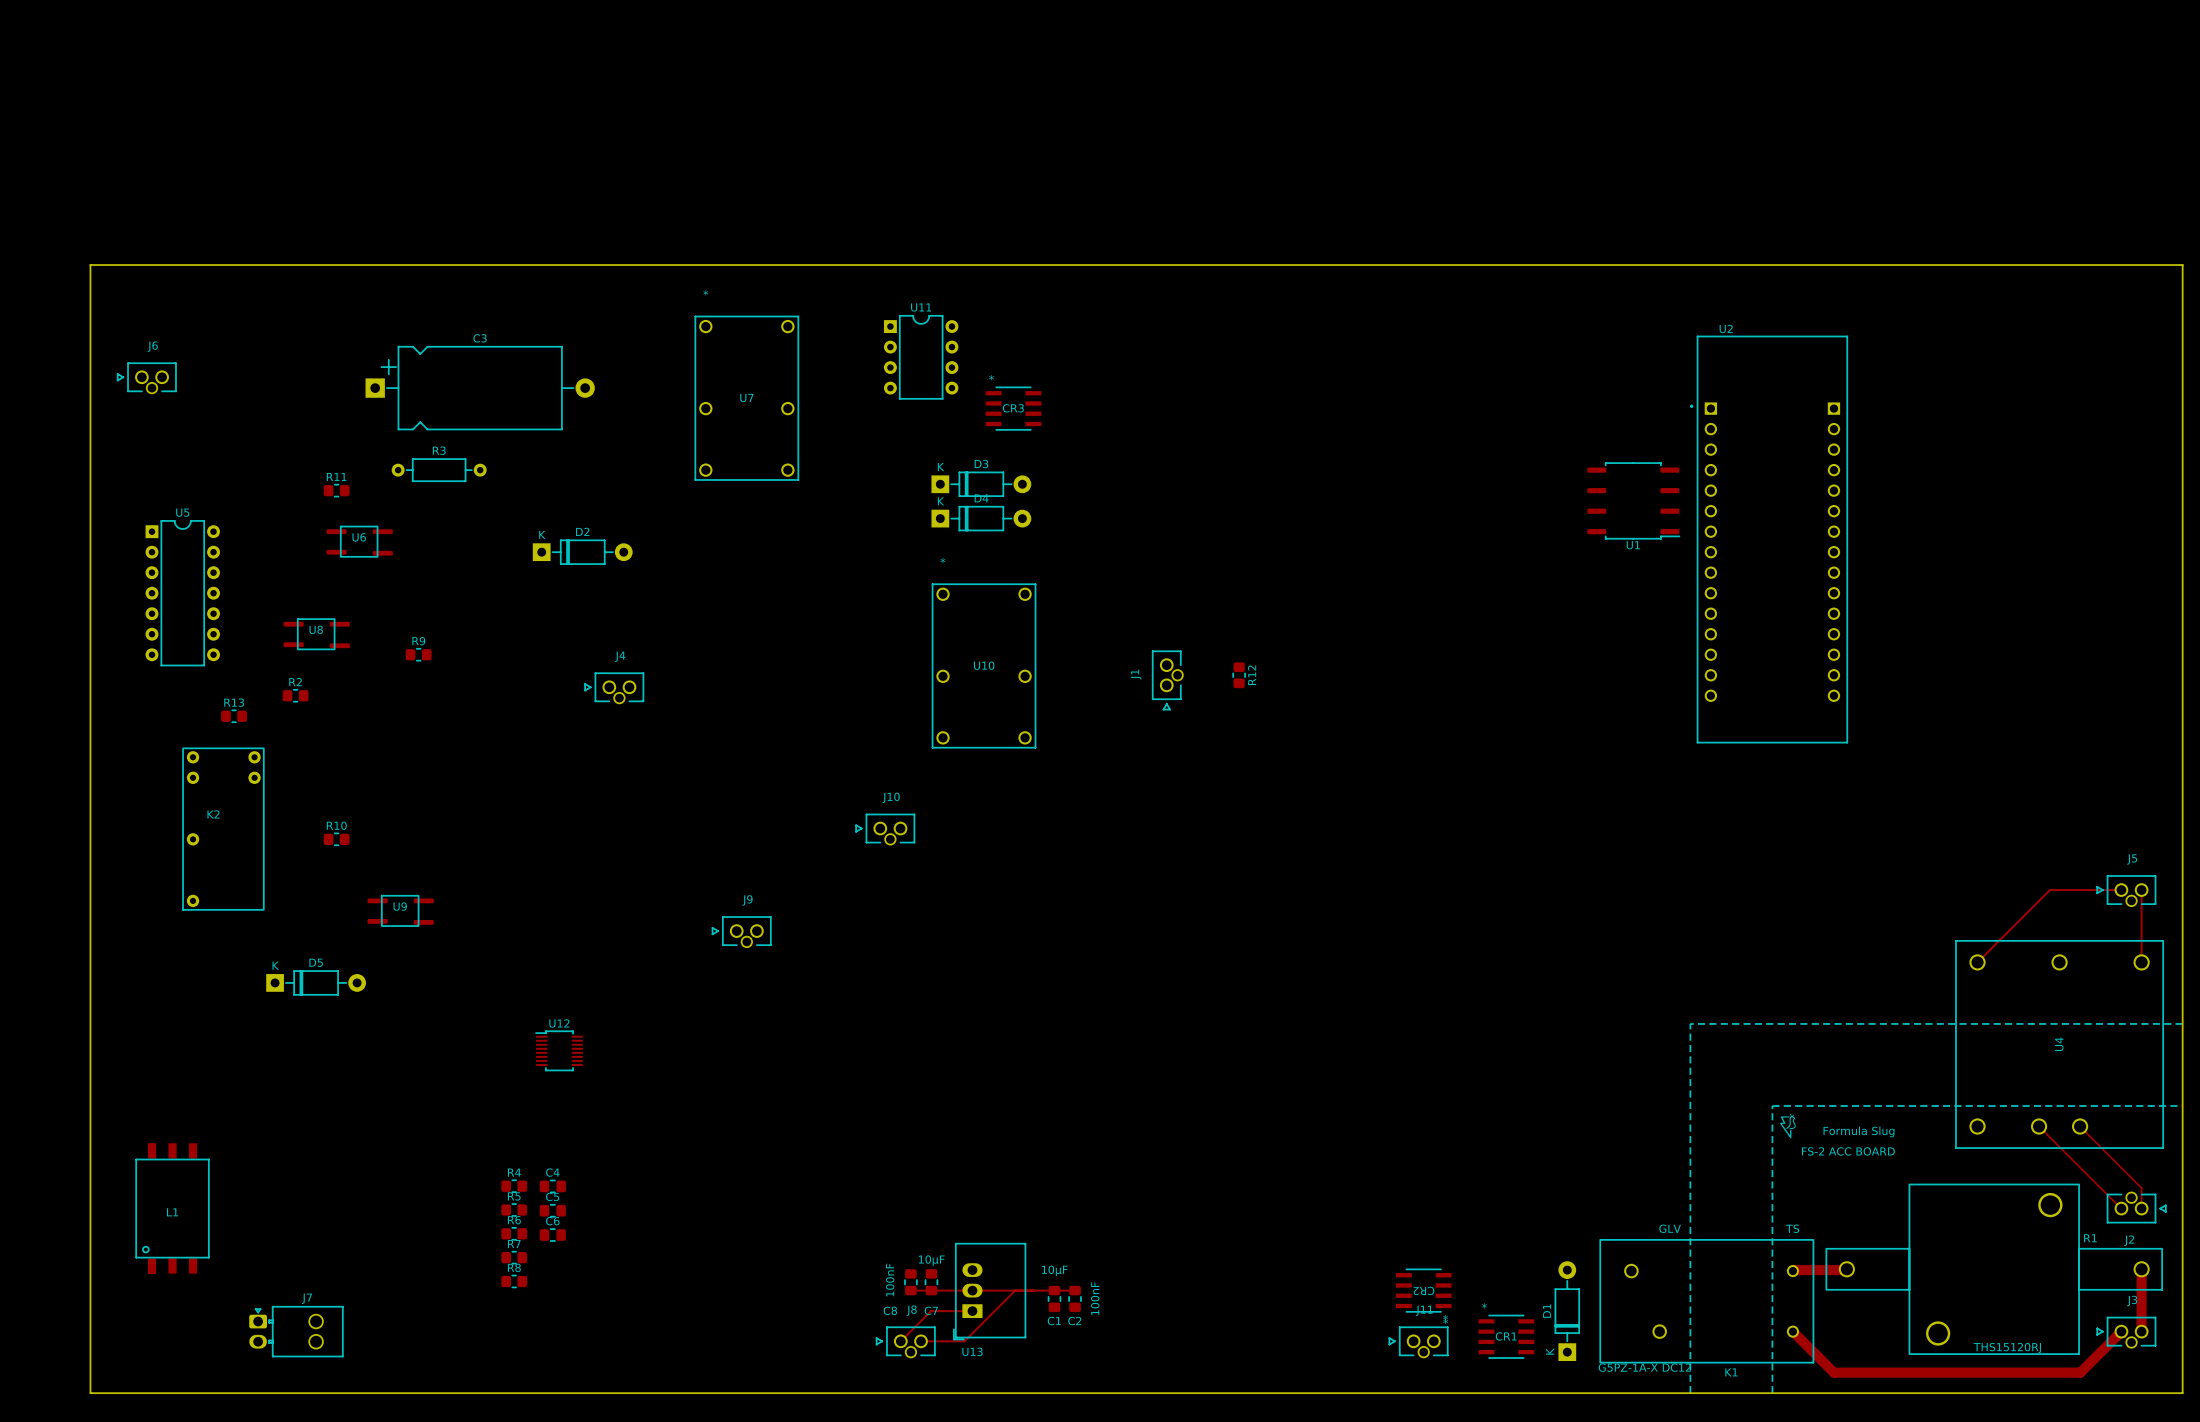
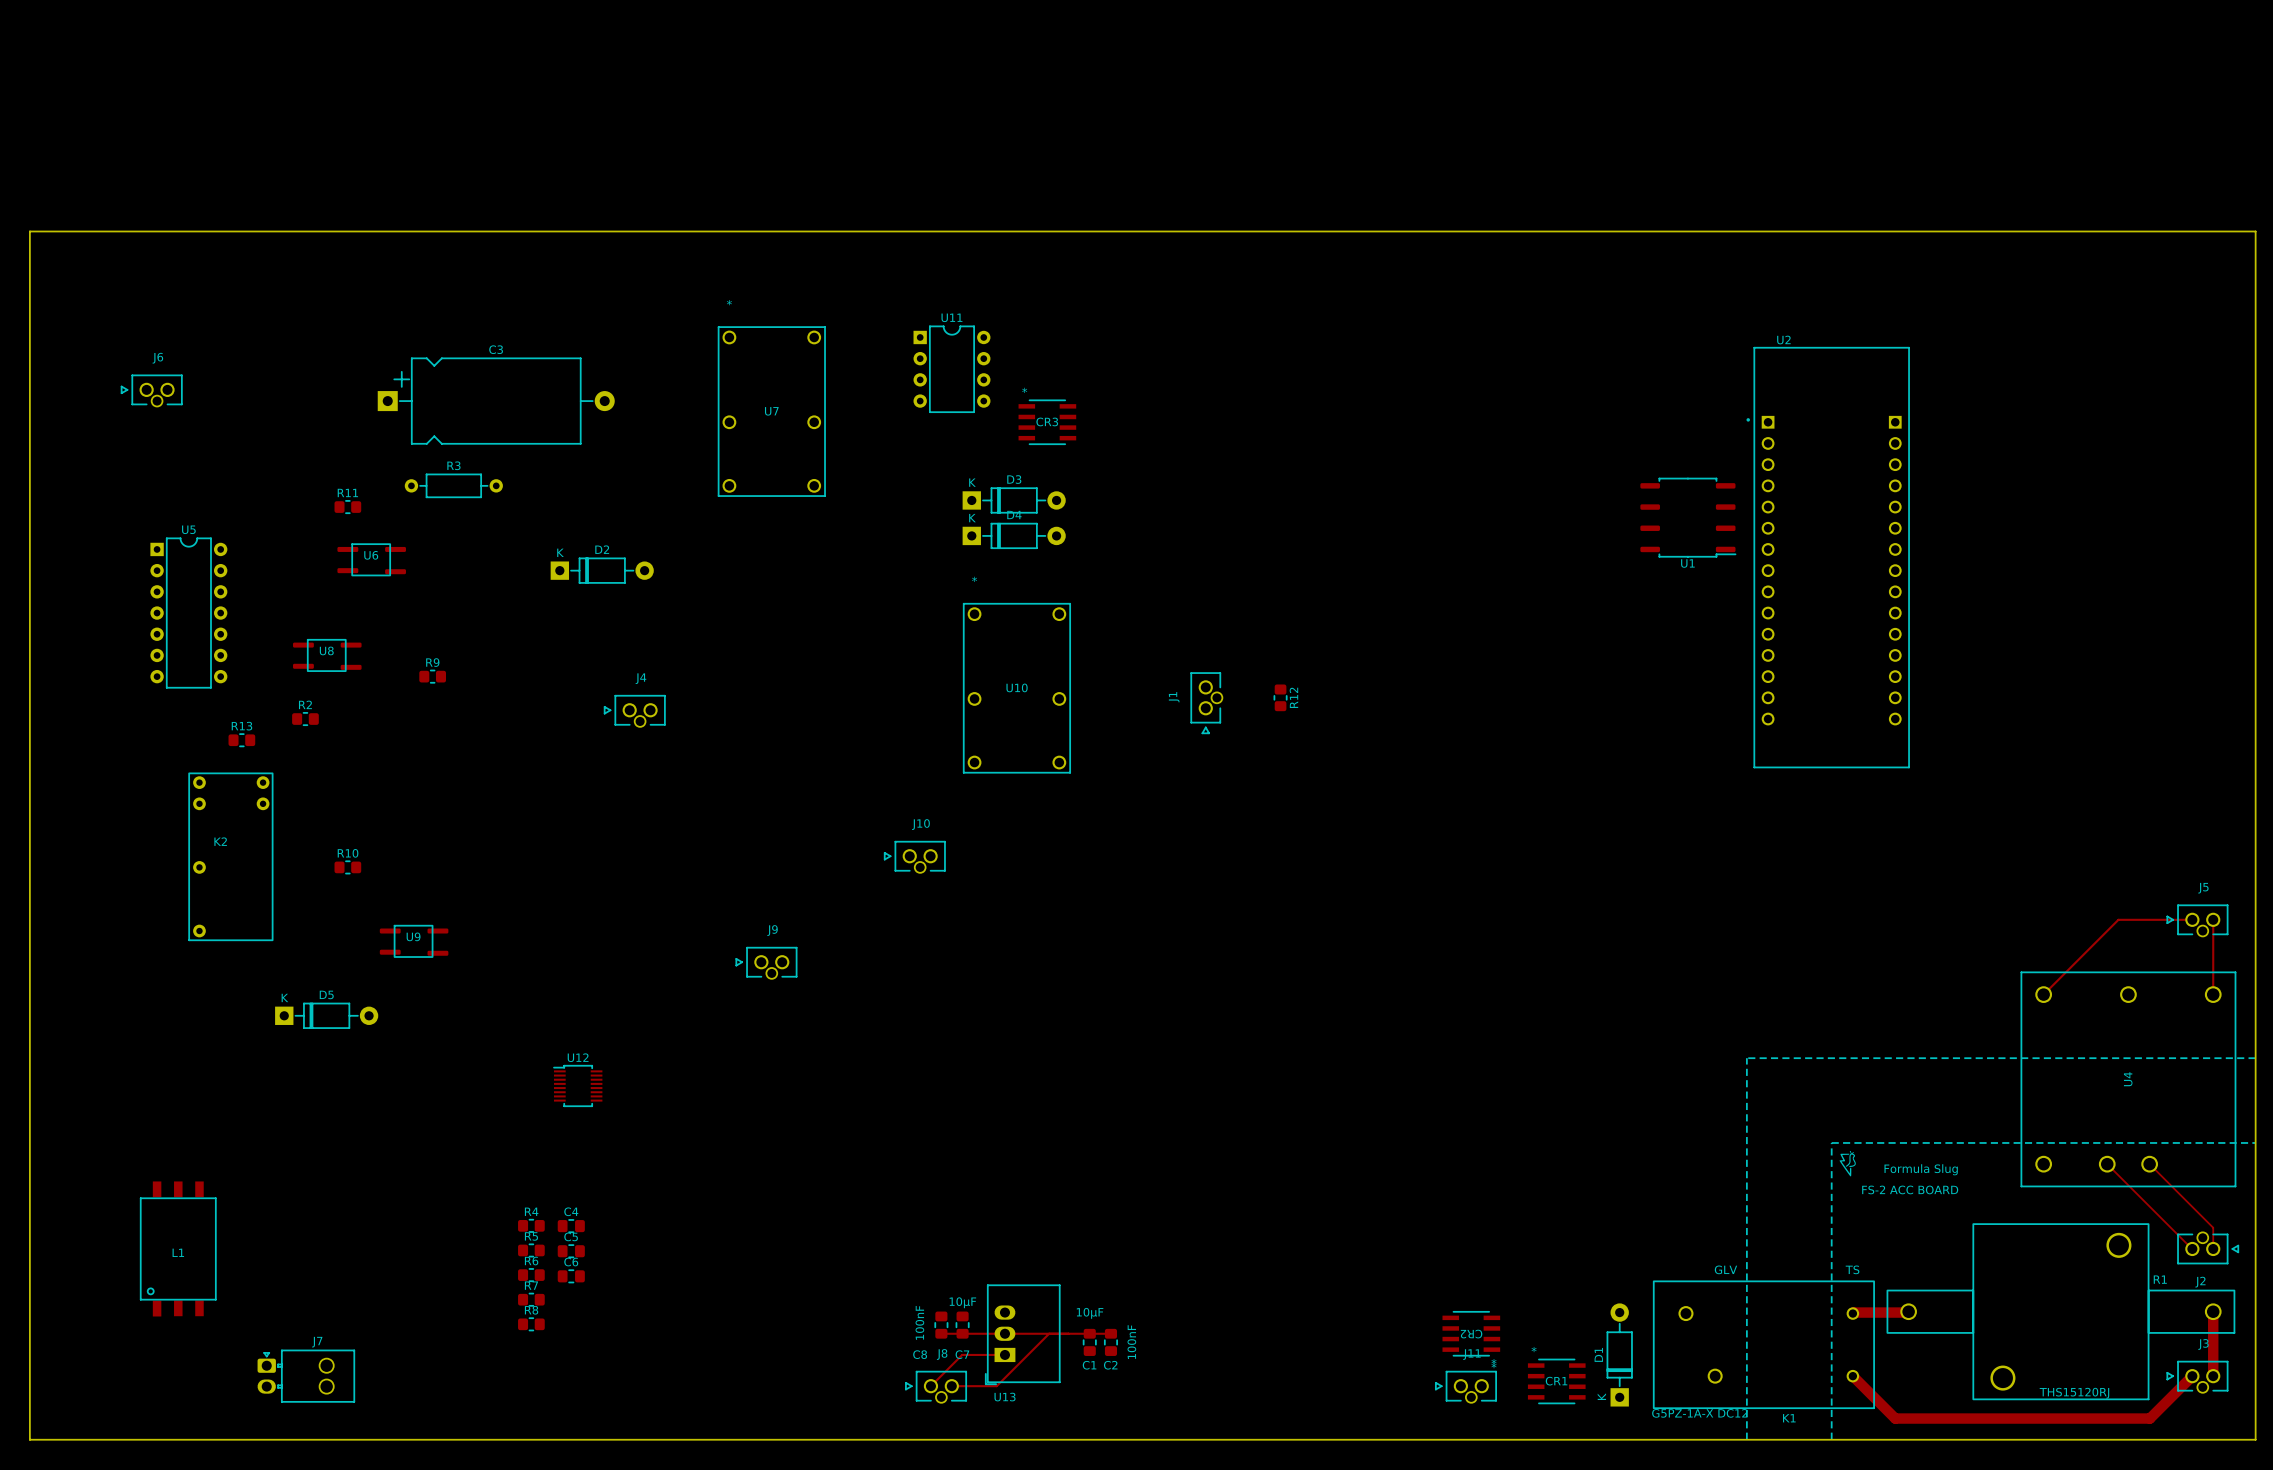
board edge: (2182, 265) (90, 265) (90, 1393) -> (2255, 273) (2255, 231) (29, 231) (29, 1439) (93, 1439)

